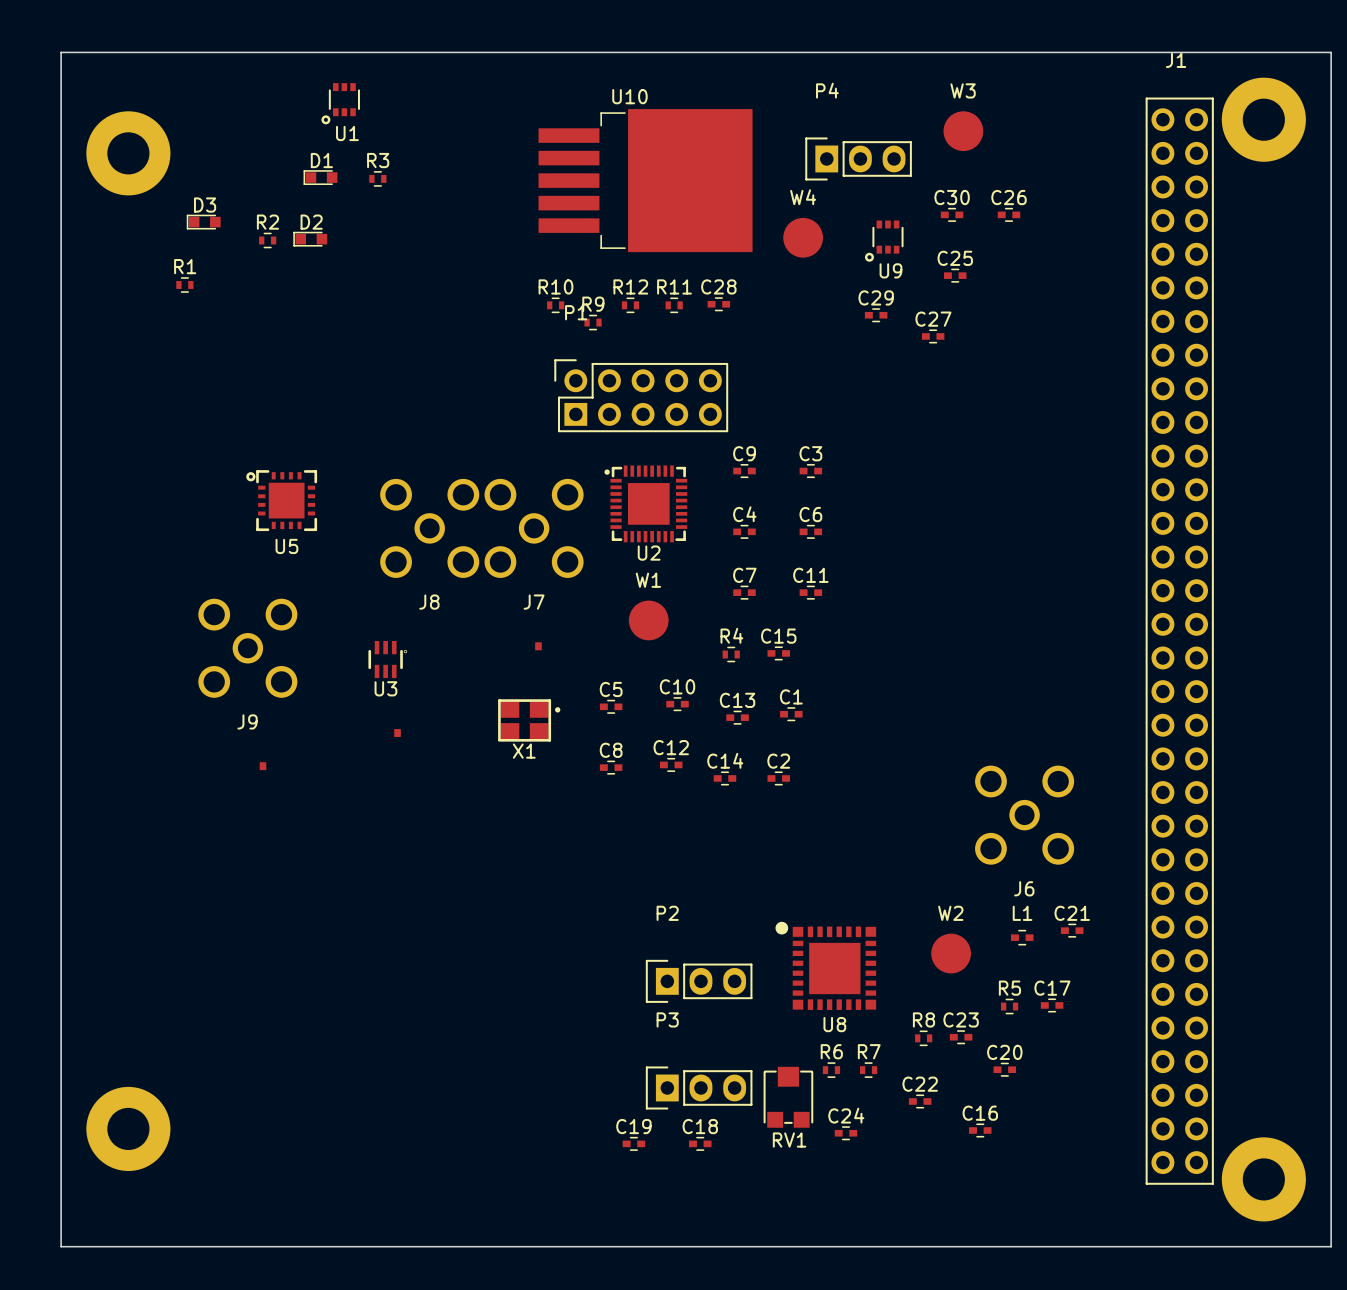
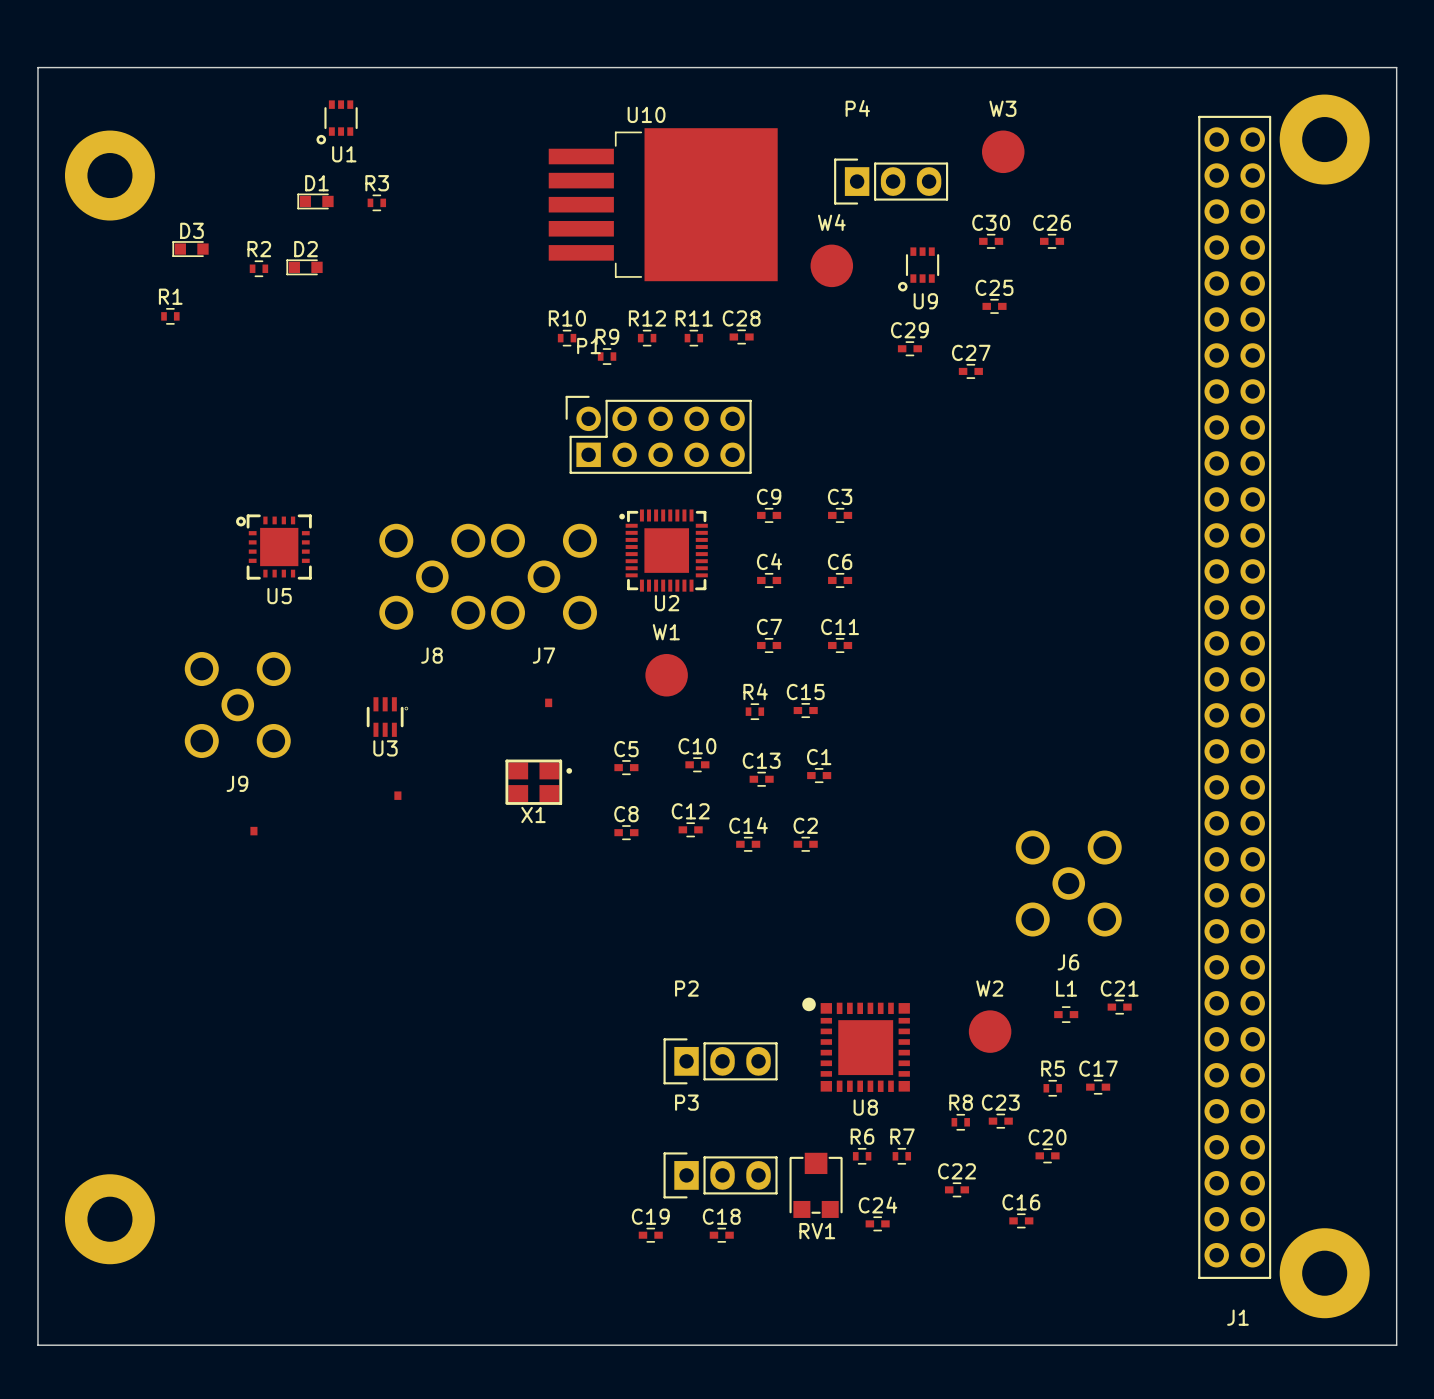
J1 name position: J1 (1176, 60) -> J1 (1237, 1317)

